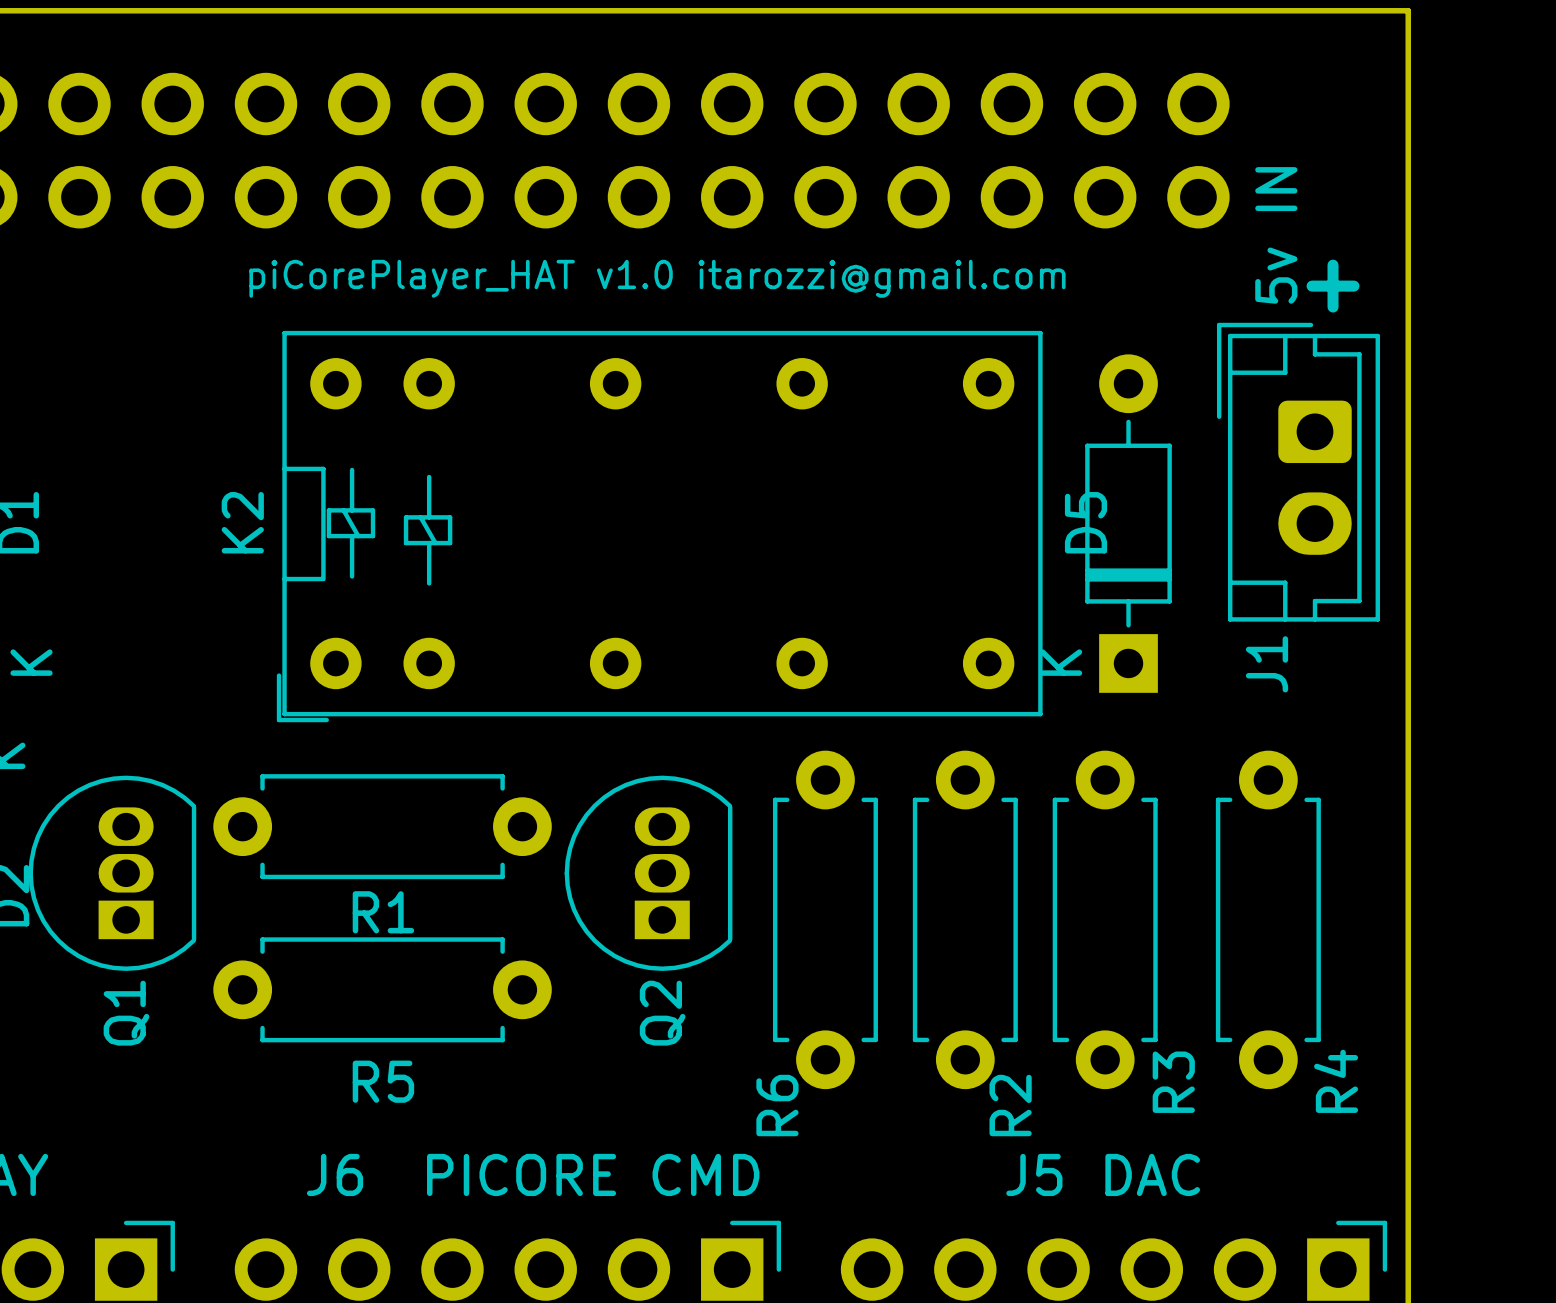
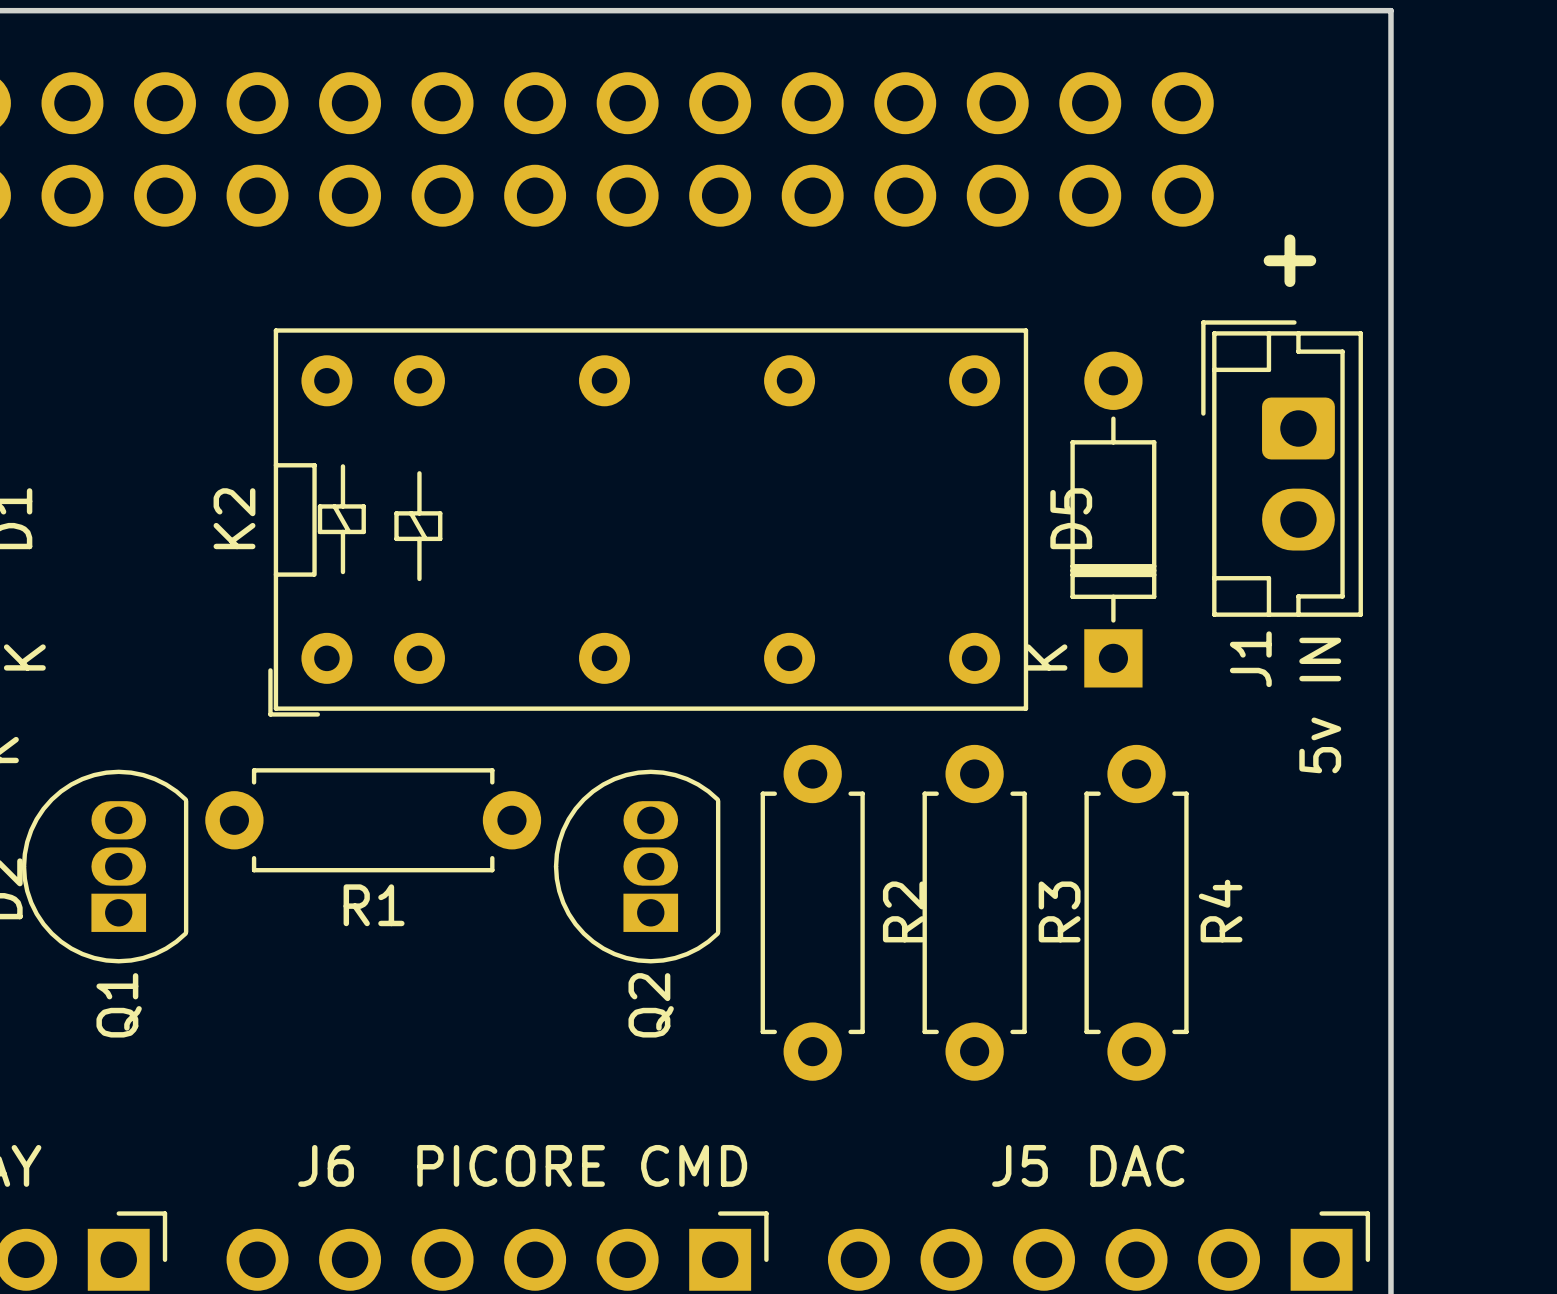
J1 value position: 5v IN (1276, 235) -> 5v IN (1320, 705)
text: piCorePlayer_HAT v1.0 itarozzi@gmail.com (657, 278) -> none
text position: + (1333, 286) -> + (1289, 260)
part: (965, 919) -> none
R3 position: (1105, 919) -> (974, 912)
R4 position: (1268, 919) -> (1136, 912)
R5: (382, 989) -> none
R4 name position: R4 (1336, 1081) -> R4 (1220, 911)
R3 name position: R3 (1173, 1082) -> R3 (1059, 911)
R6 name: R6 (777, 1105) -> none
text position: R2 (1010, 1105) -> R2 (903, 911)

